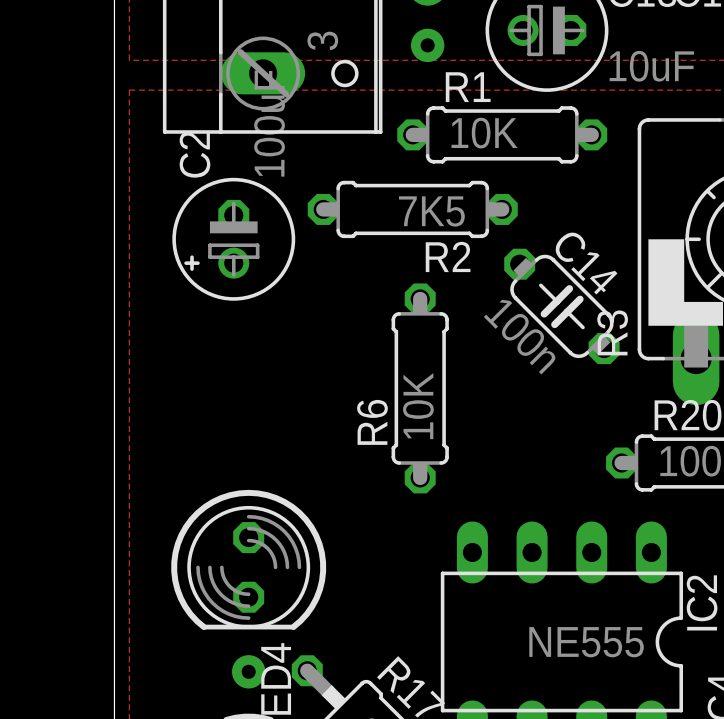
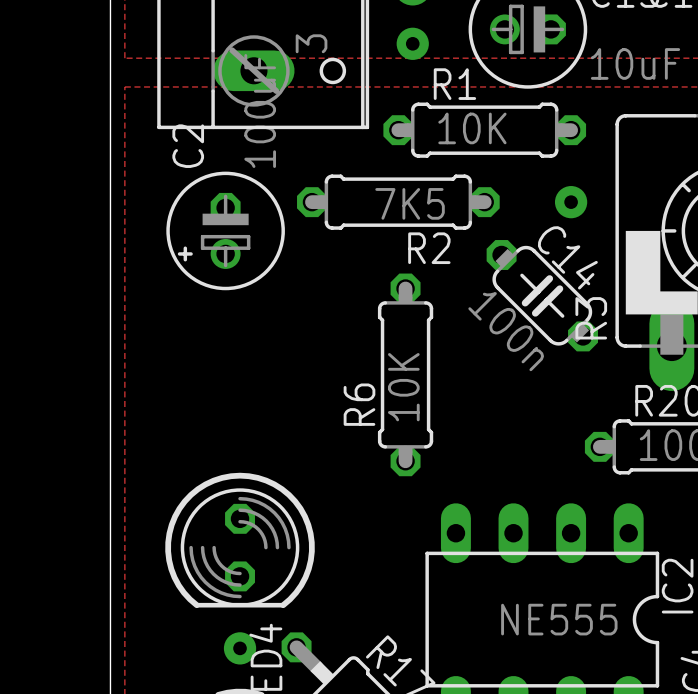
via: none -> (571, 202)

